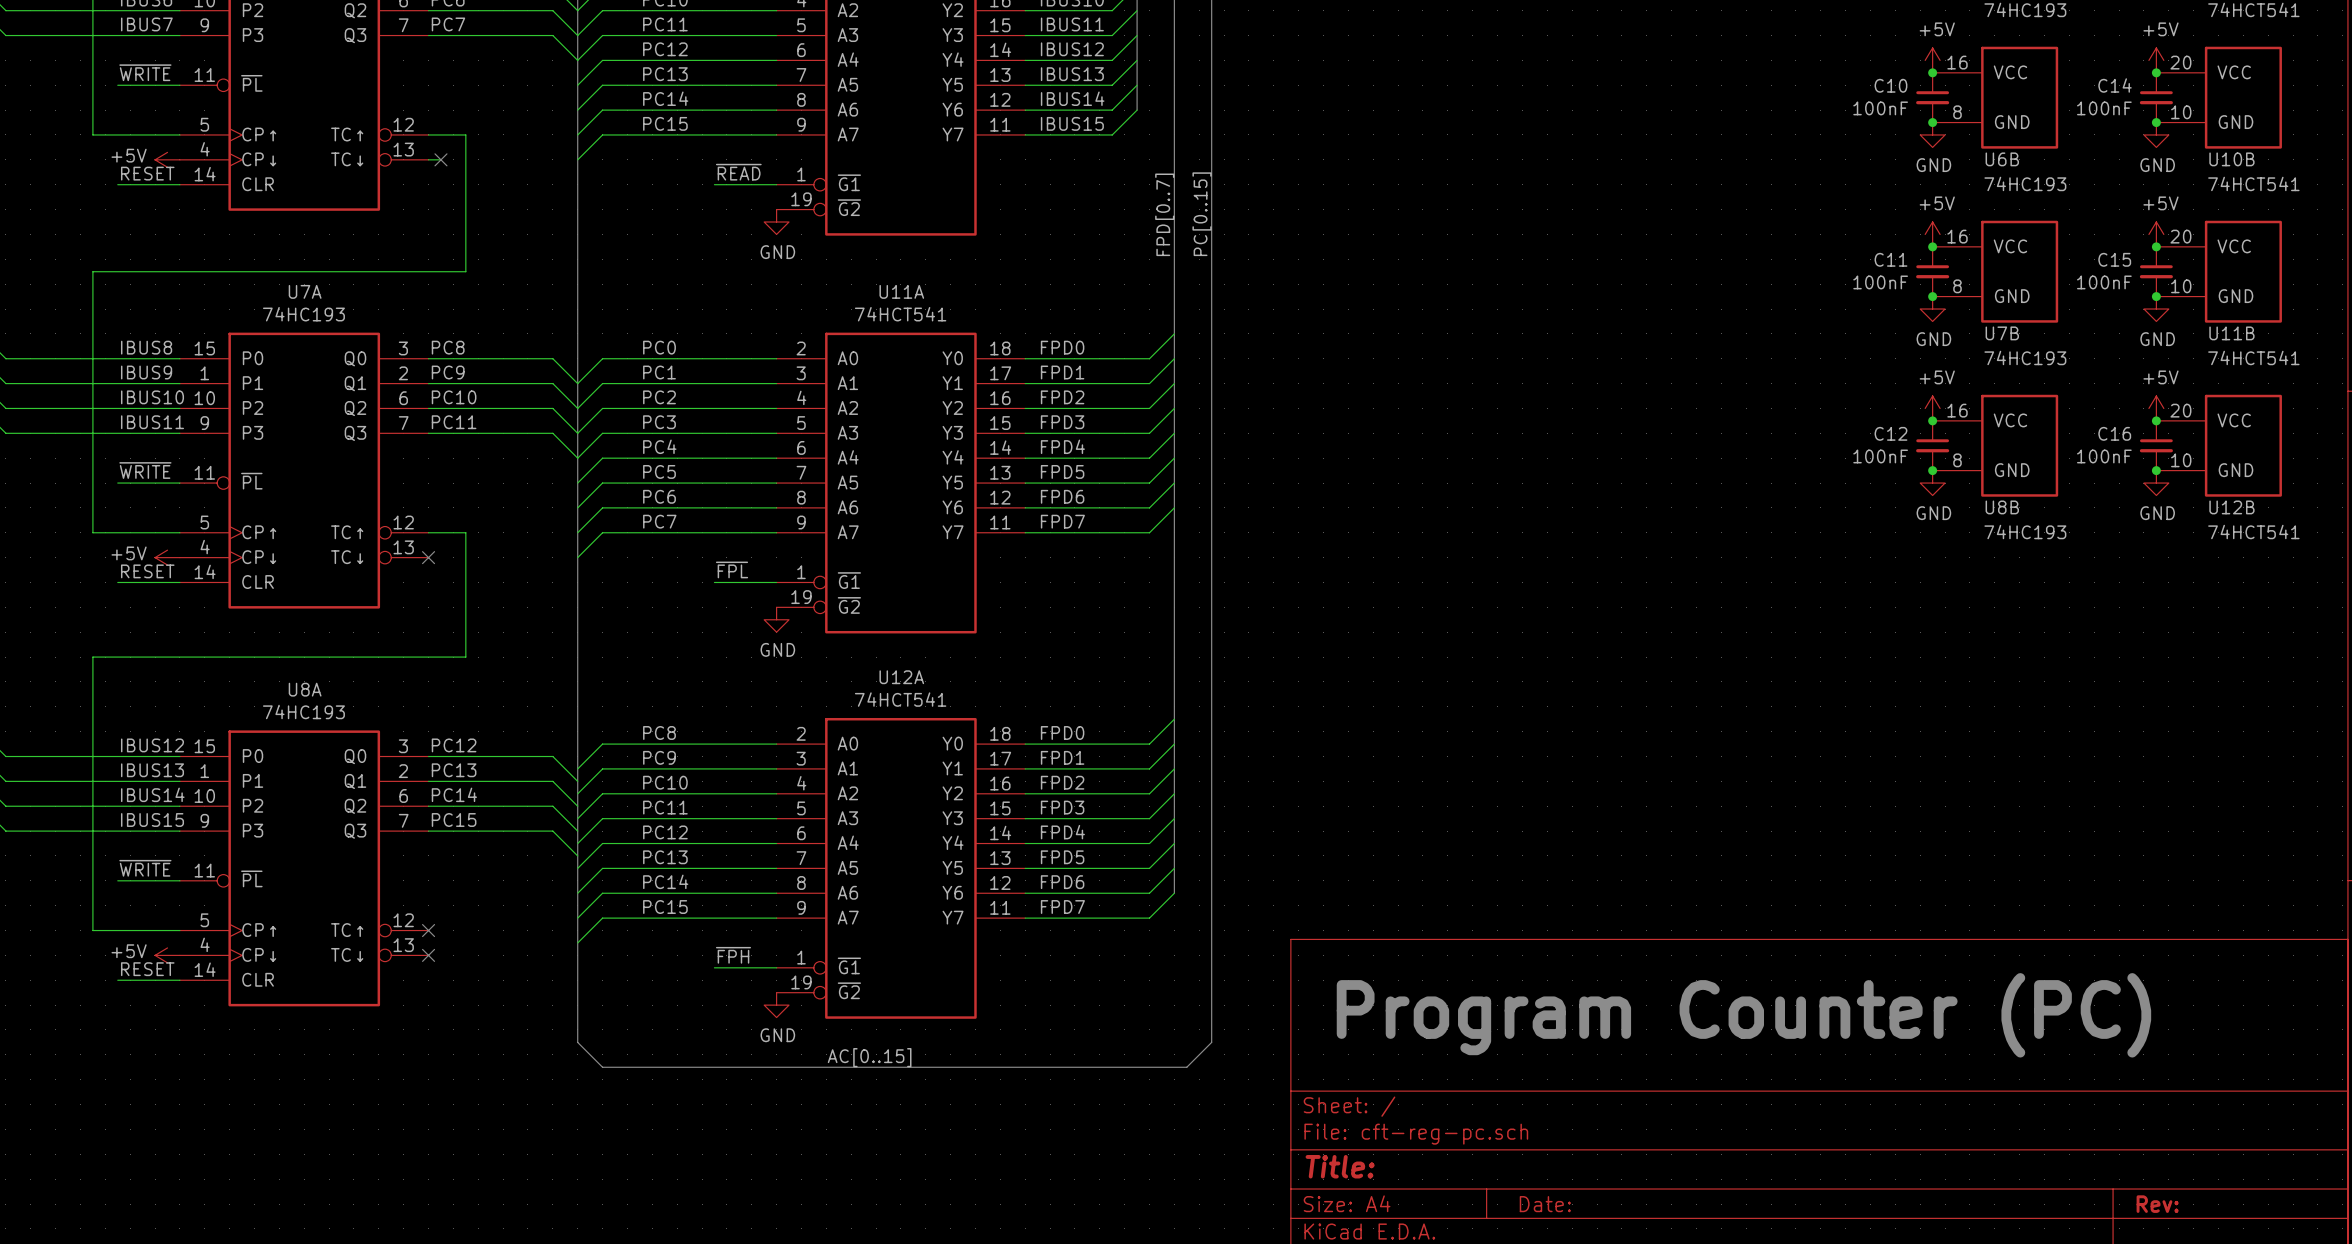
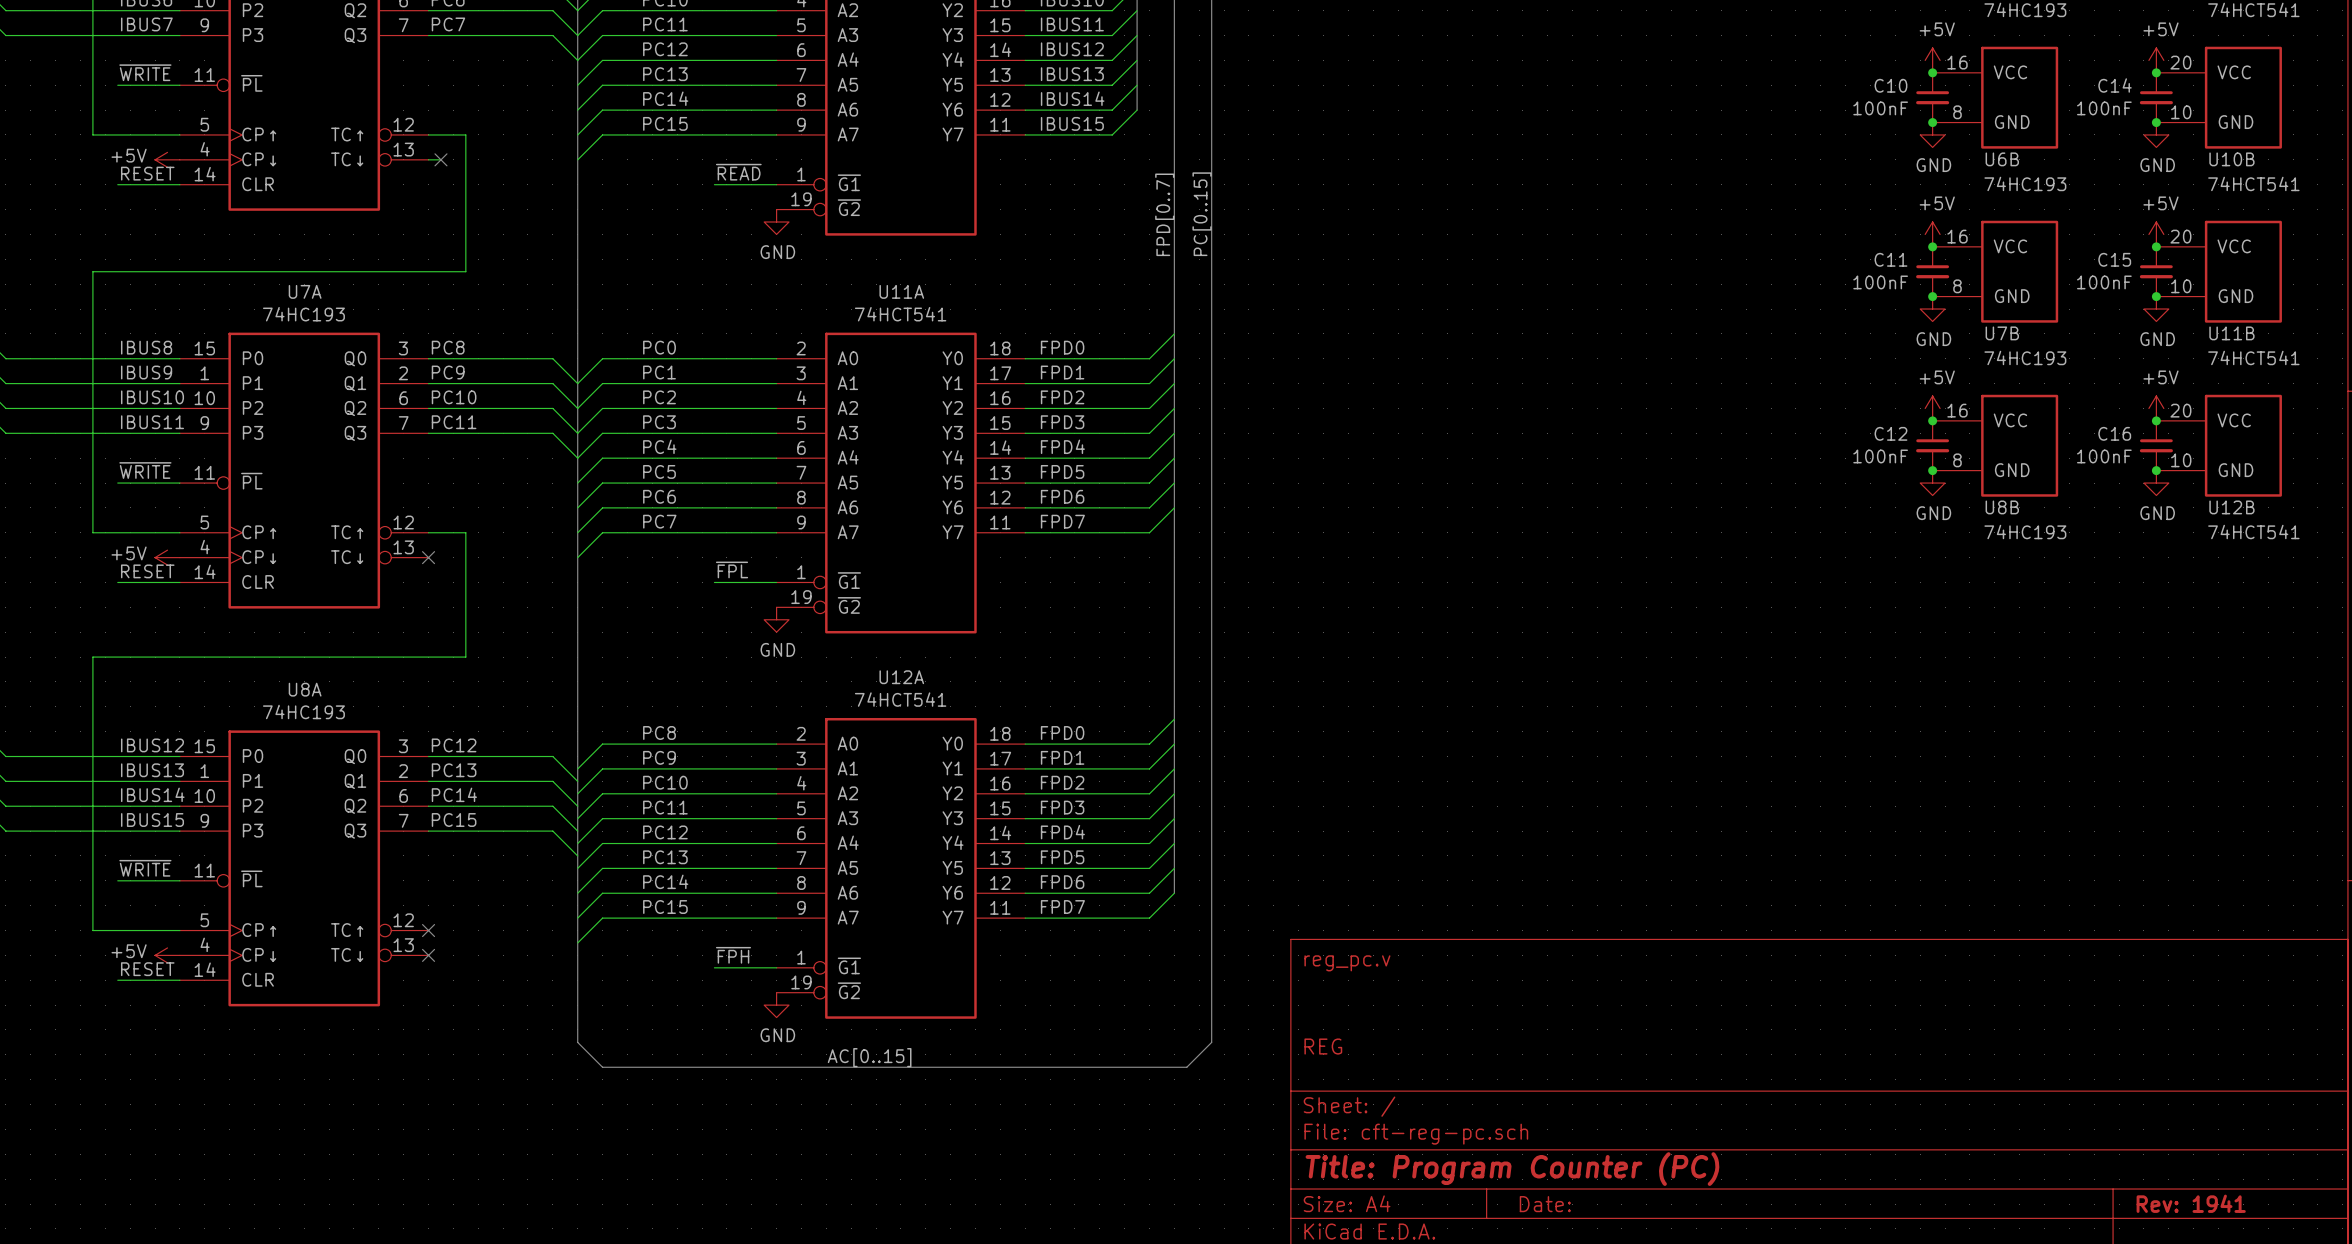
title block: none -> reg_pc.v (1347, 963)
text: Program Counter (PC) (1743, 1015) -> none
title block: none -> REG (1323, 1046)
title block: Title: (1340, 1166) -> Title: Program Counter (PC) (1512, 1169)
title block: Rev: (2157, 1204) -> Rev: 1941 (2191, 1203)

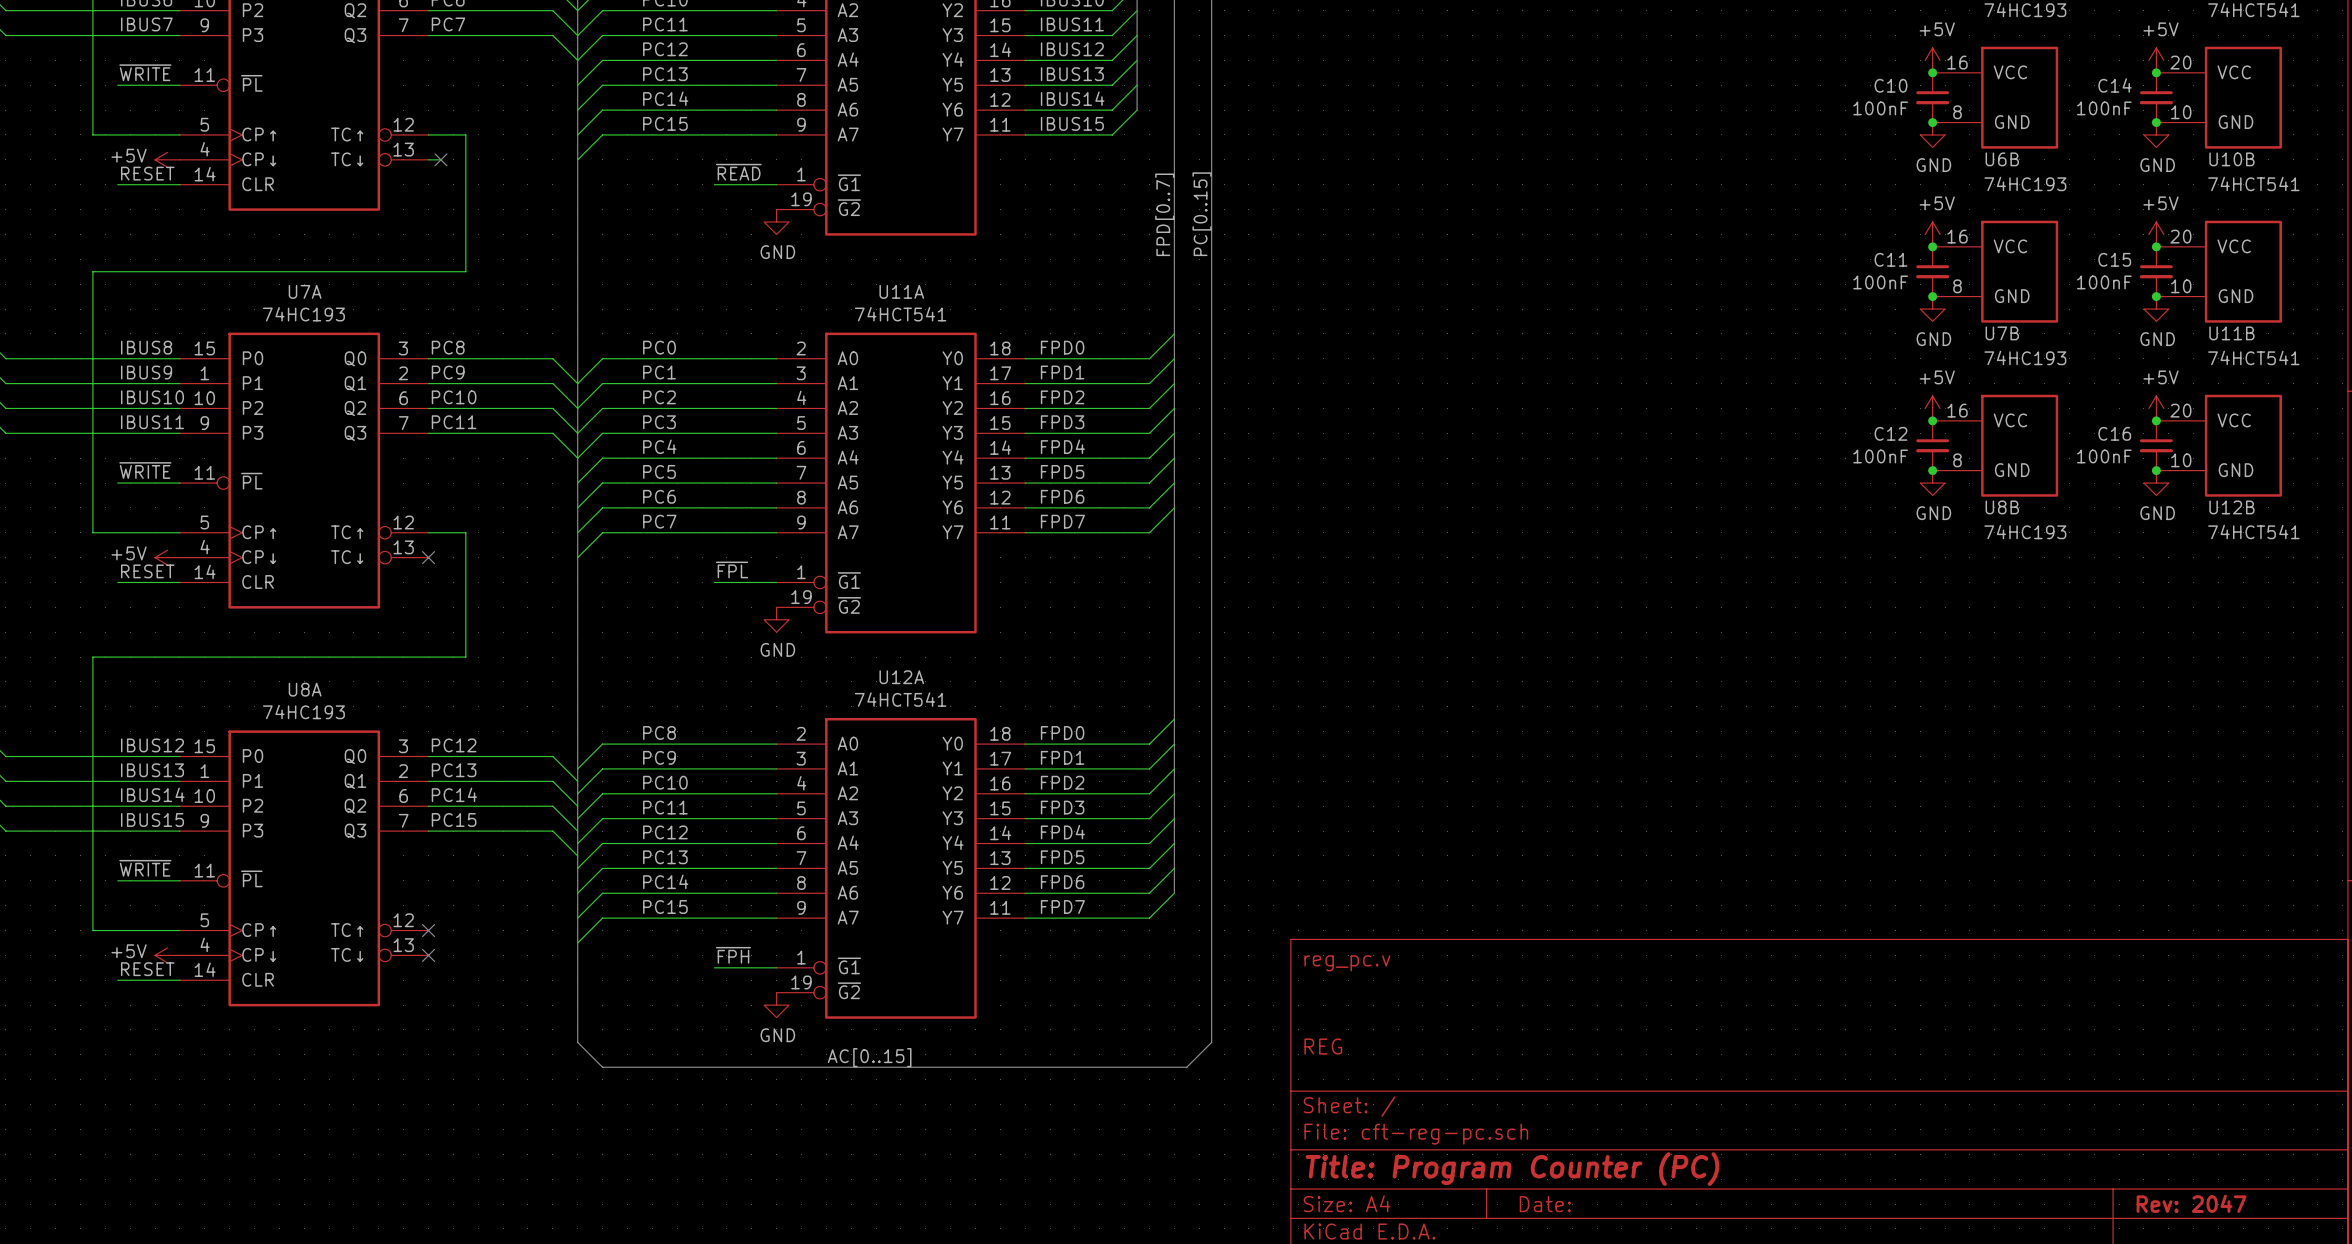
title block: Rev: 1941 (2191, 1203) -> Rev: 2047 (2191, 1203)

